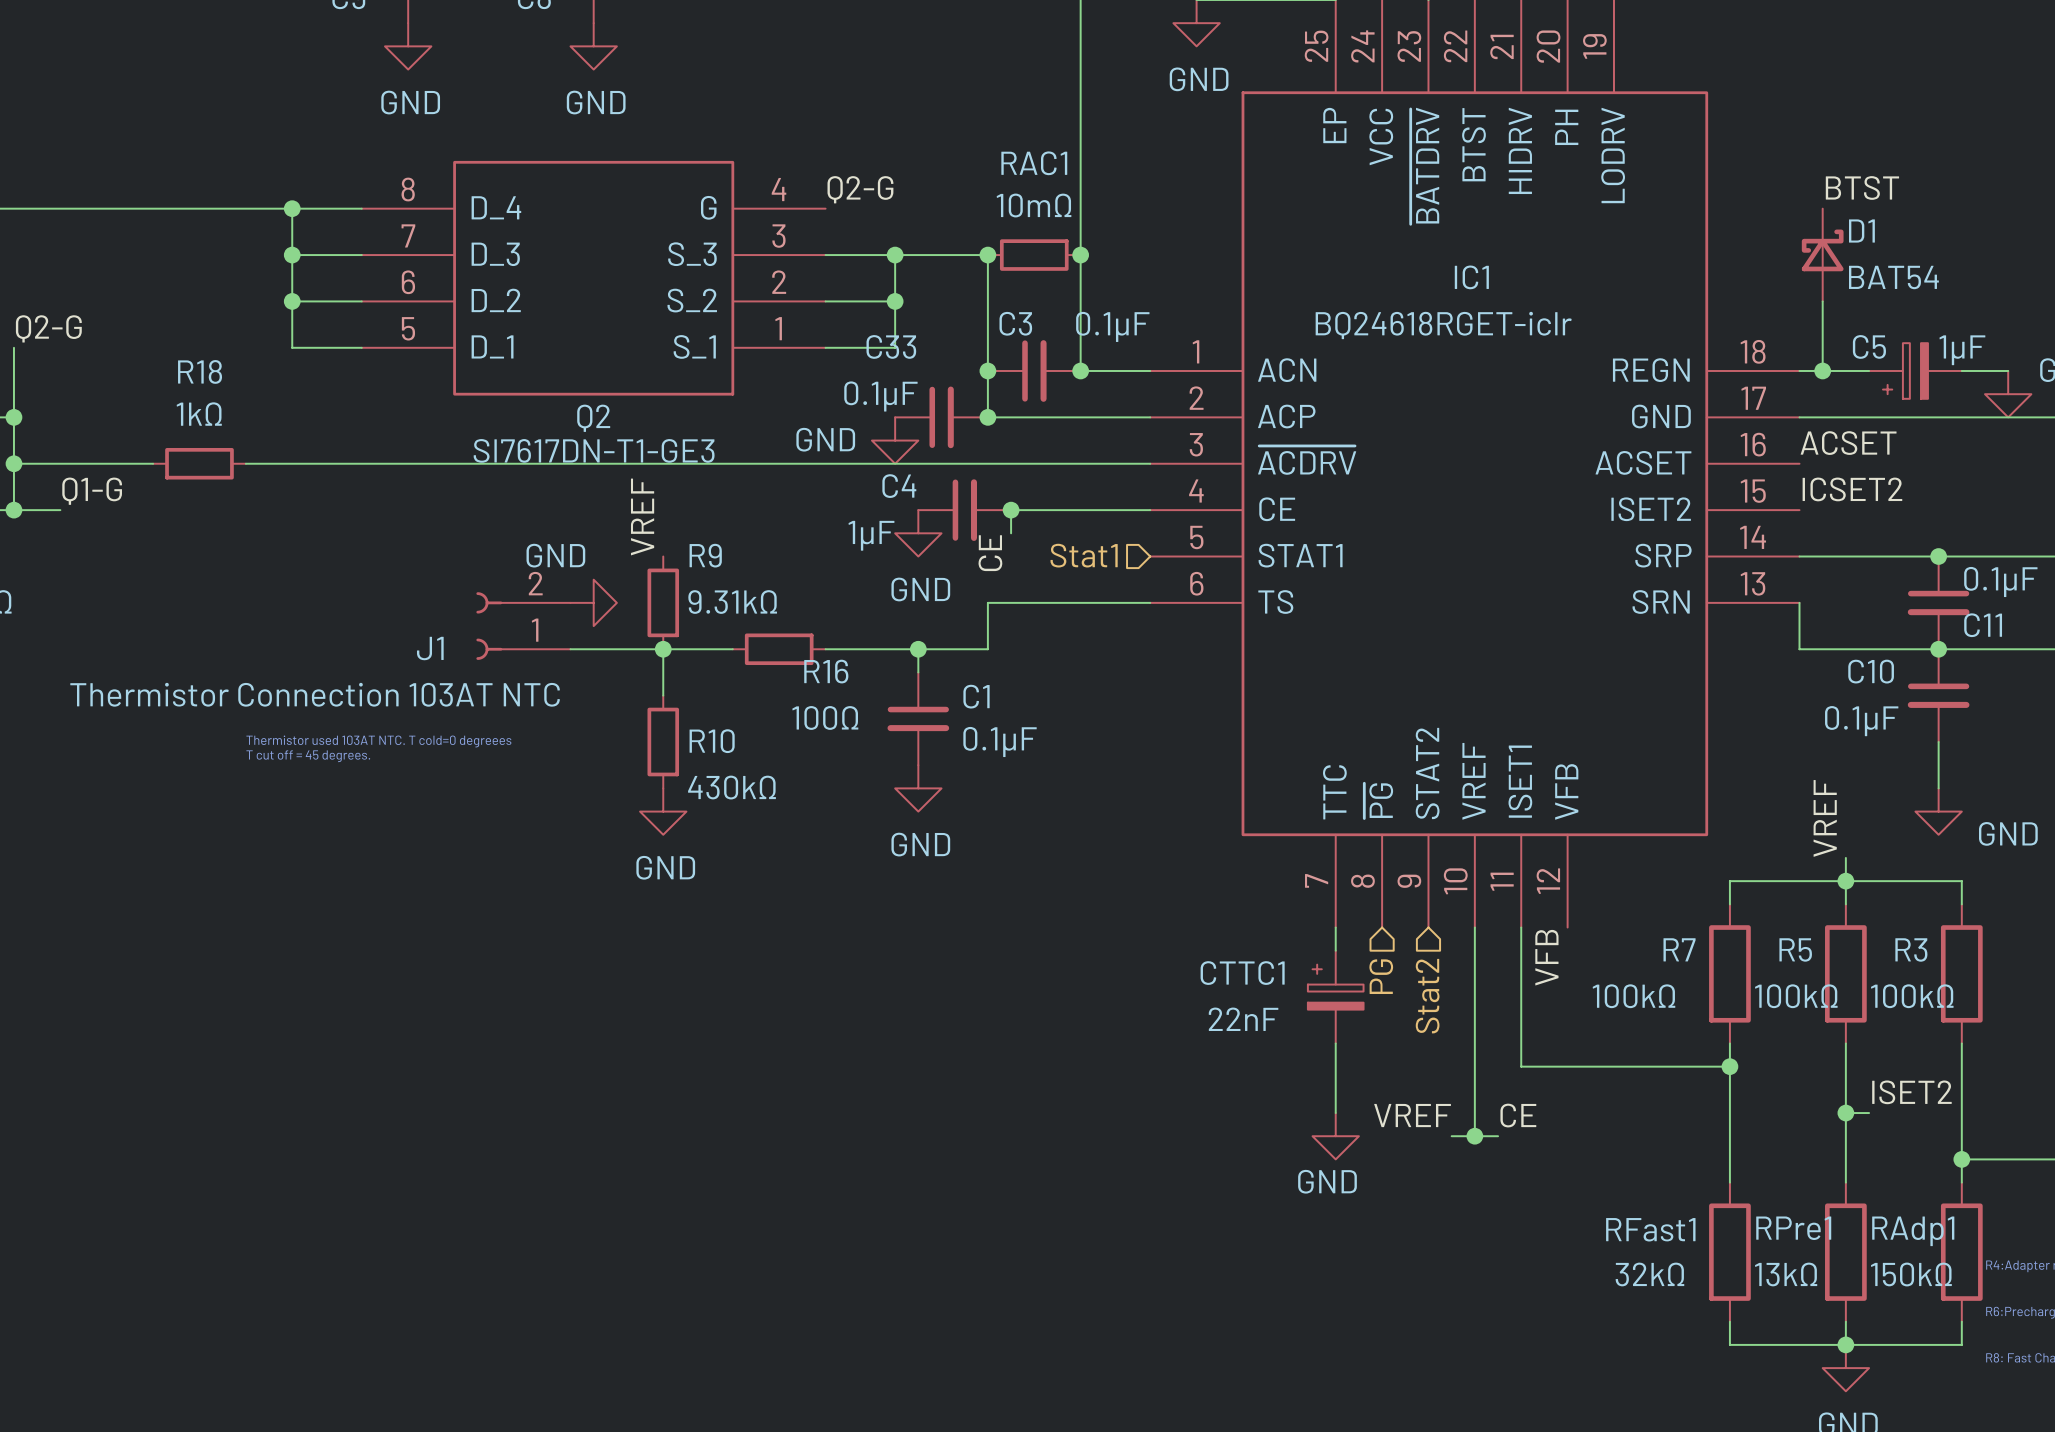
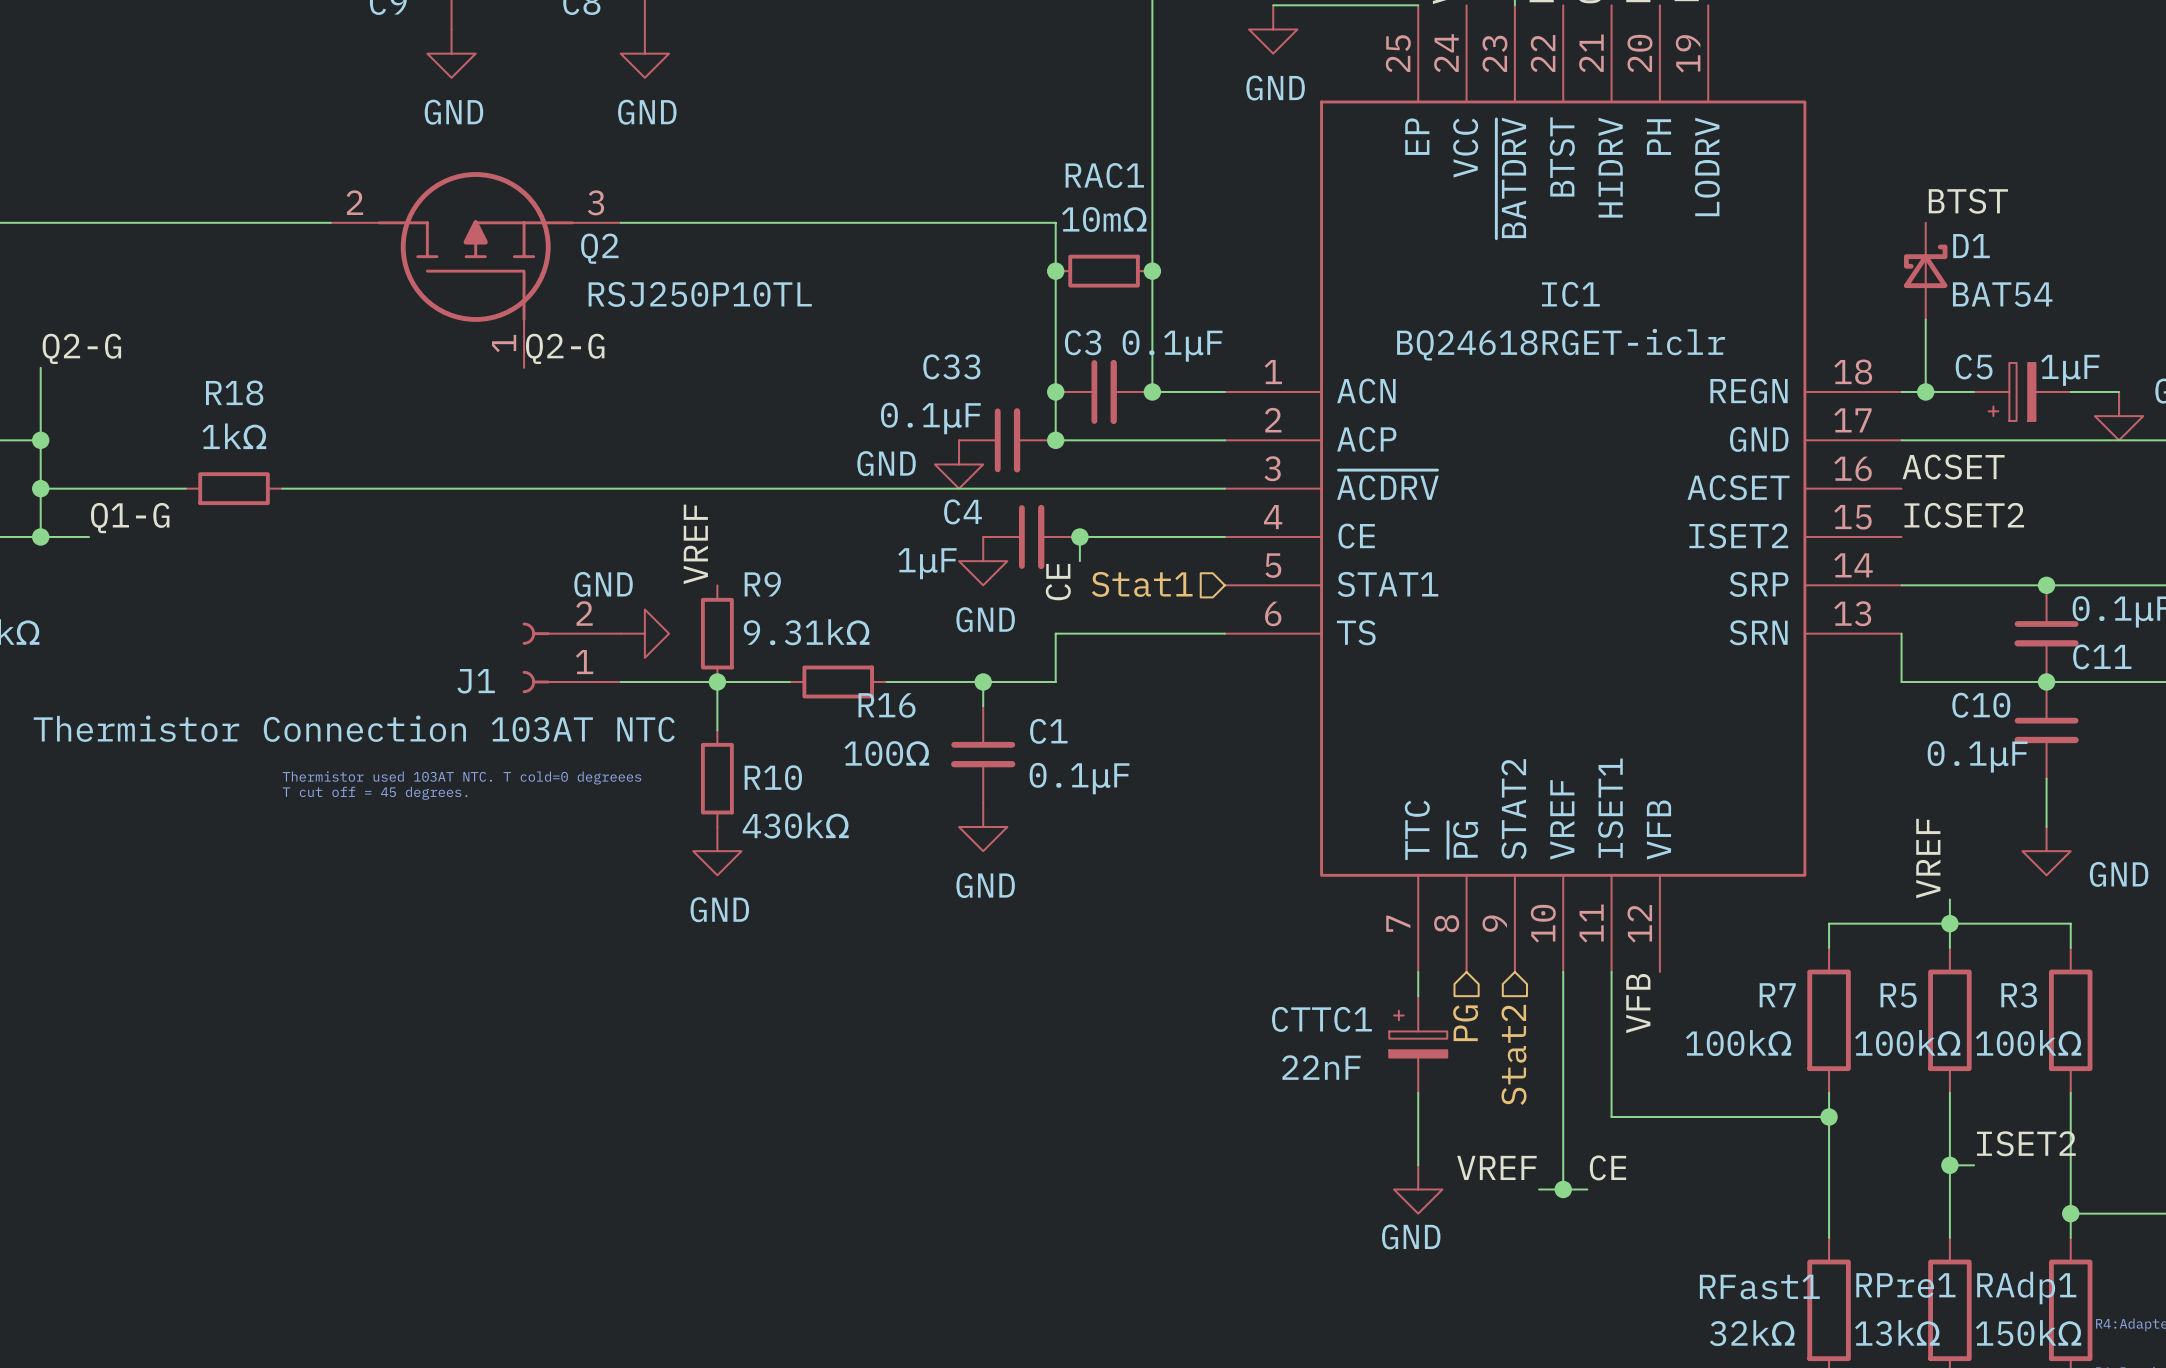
Q2 symbol: [361, 160, 826, 396] -> [330, 172, 621, 368]
label position: Q2-G (860, 189) -> Q2-G (565, 348)
junction: (292, 208) -> none
wire: (361, 208) (292, 208) (292, 347) (361, 347) -> none
wire: (292, 255) (361, 255) -> none
junction: (292, 255) -> none
wire: (825, 255) (987, 255) -> (620, 222) (1055, 222) (1055, 271)
wire: (895, 255) (895, 347) (825, 347) -> none
junction: (895, 255) -> none
wire: (292, 301) (361, 301) -> none
junction: (292, 301) -> none
wire: (825, 301) (895, 301) -> none
junction: (895, 301) -> none
Q2 name position: Q2 (593, 418) -> Q2 (599, 248)
Q2 value: SI7617DN-T1-GE3 (594, 450) -> RSJ250P10TL (700, 294)

